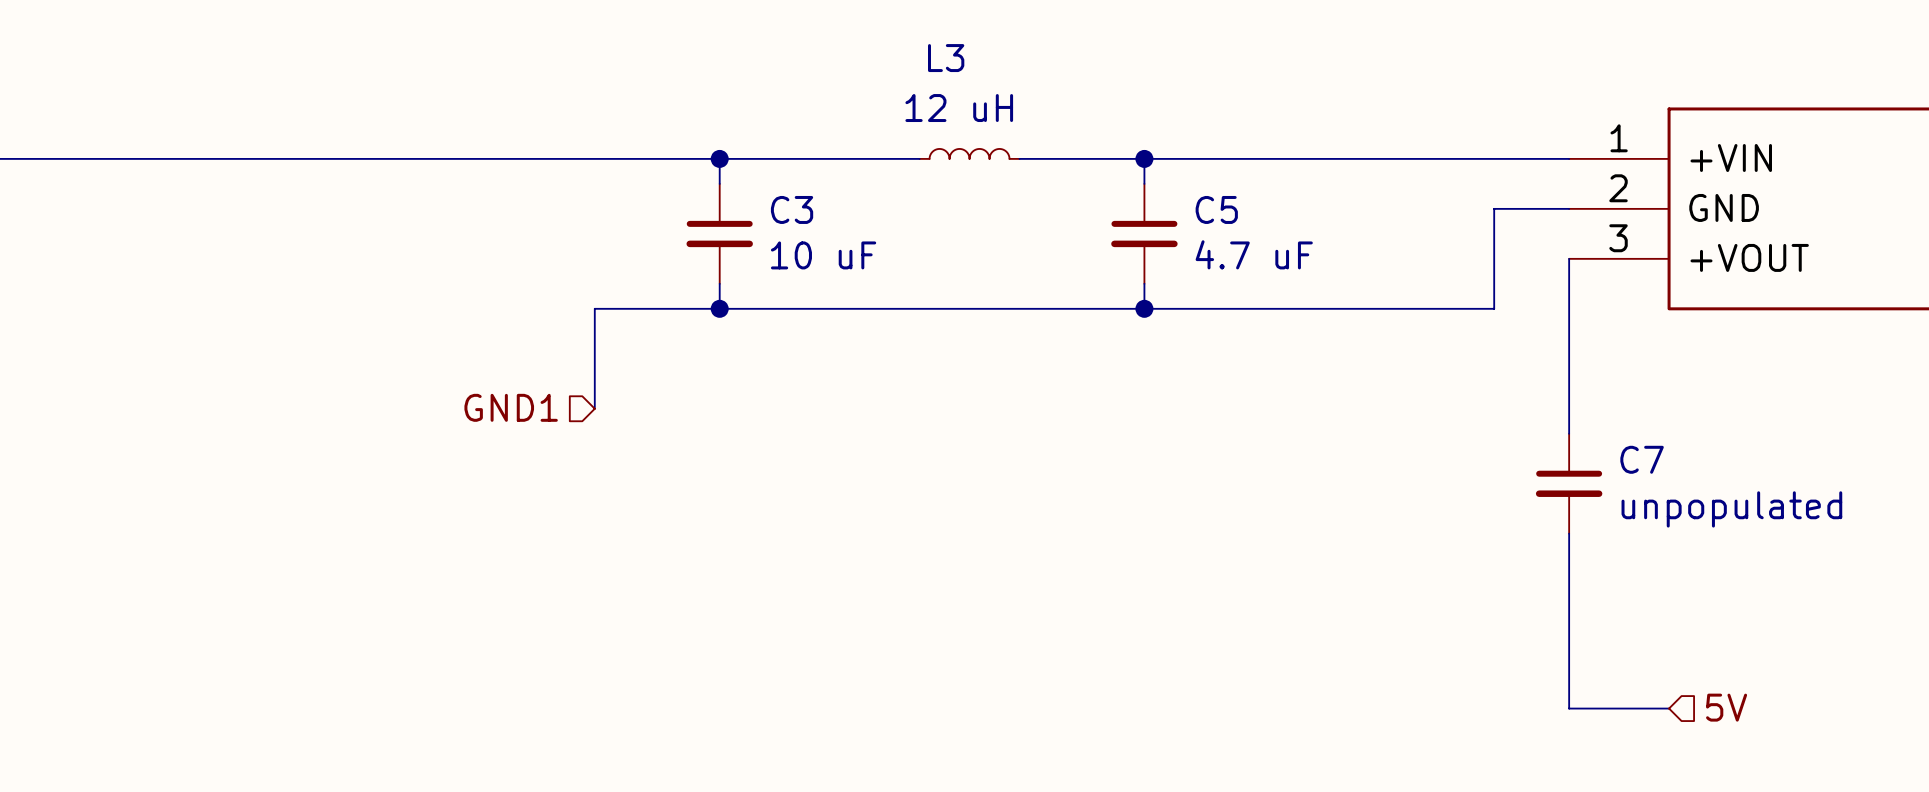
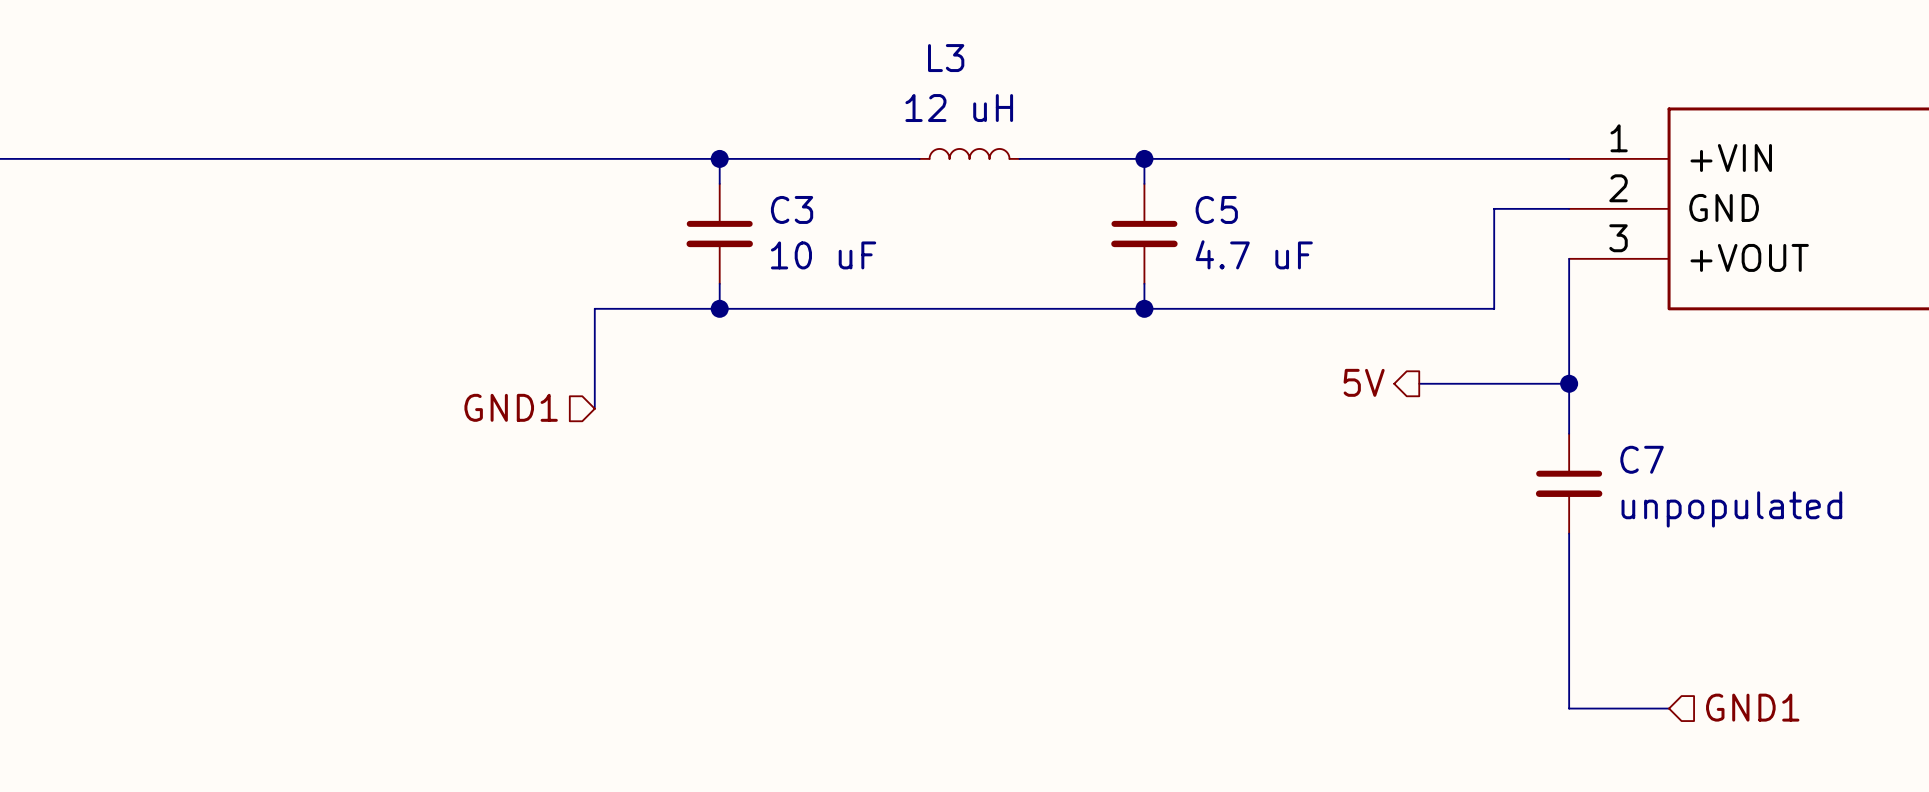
hierarchical label: none -> 5V (1364, 382)
wire: none -> (1419, 383) (1569, 383)
junction: none -> (1569, 383)
hierarchical label: 5V (1726, 707) -> GND1 (1752, 707)

